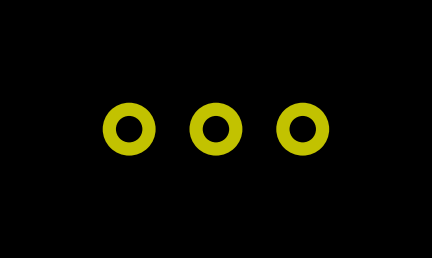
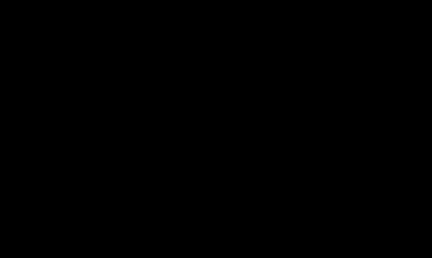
part: (215, 129) -> none

